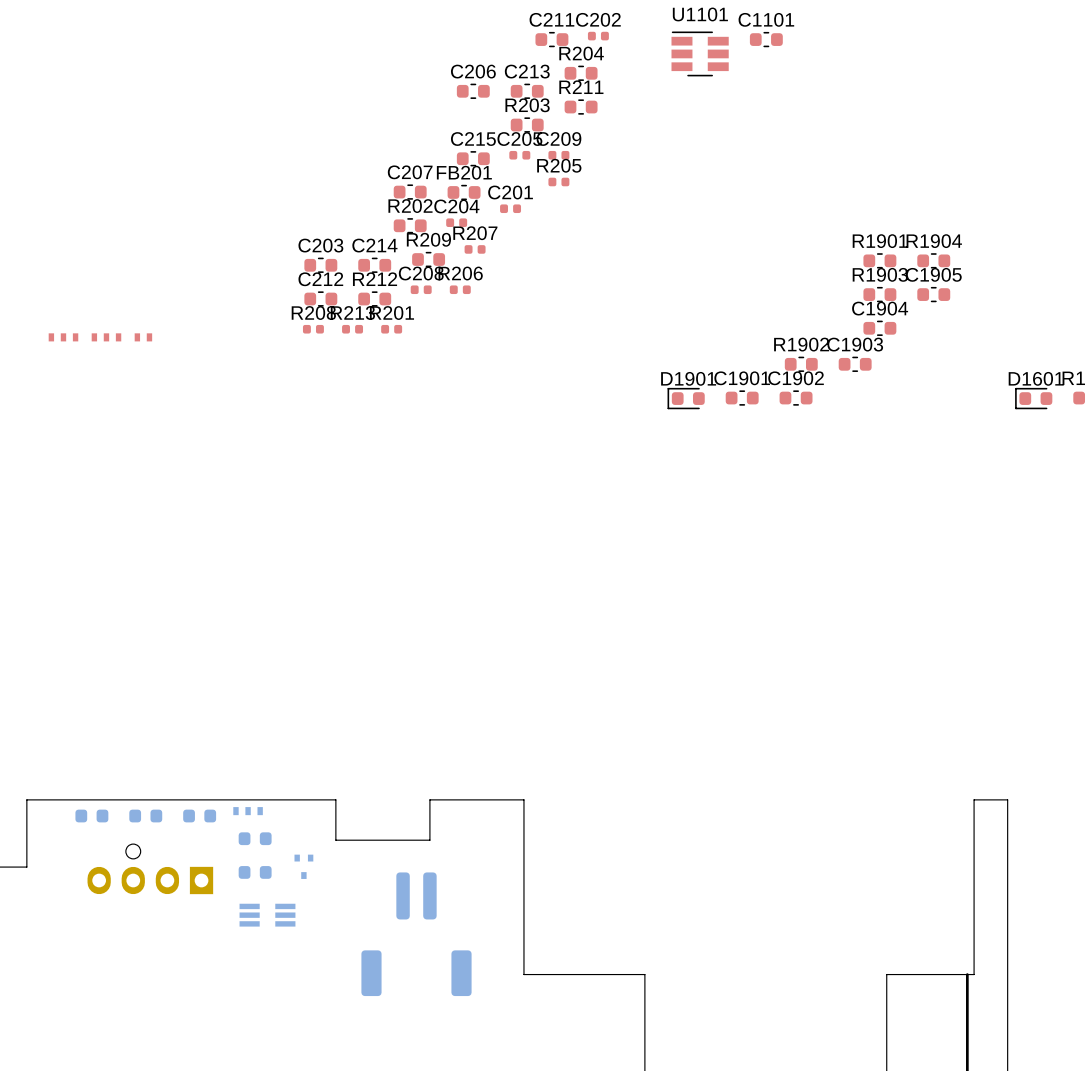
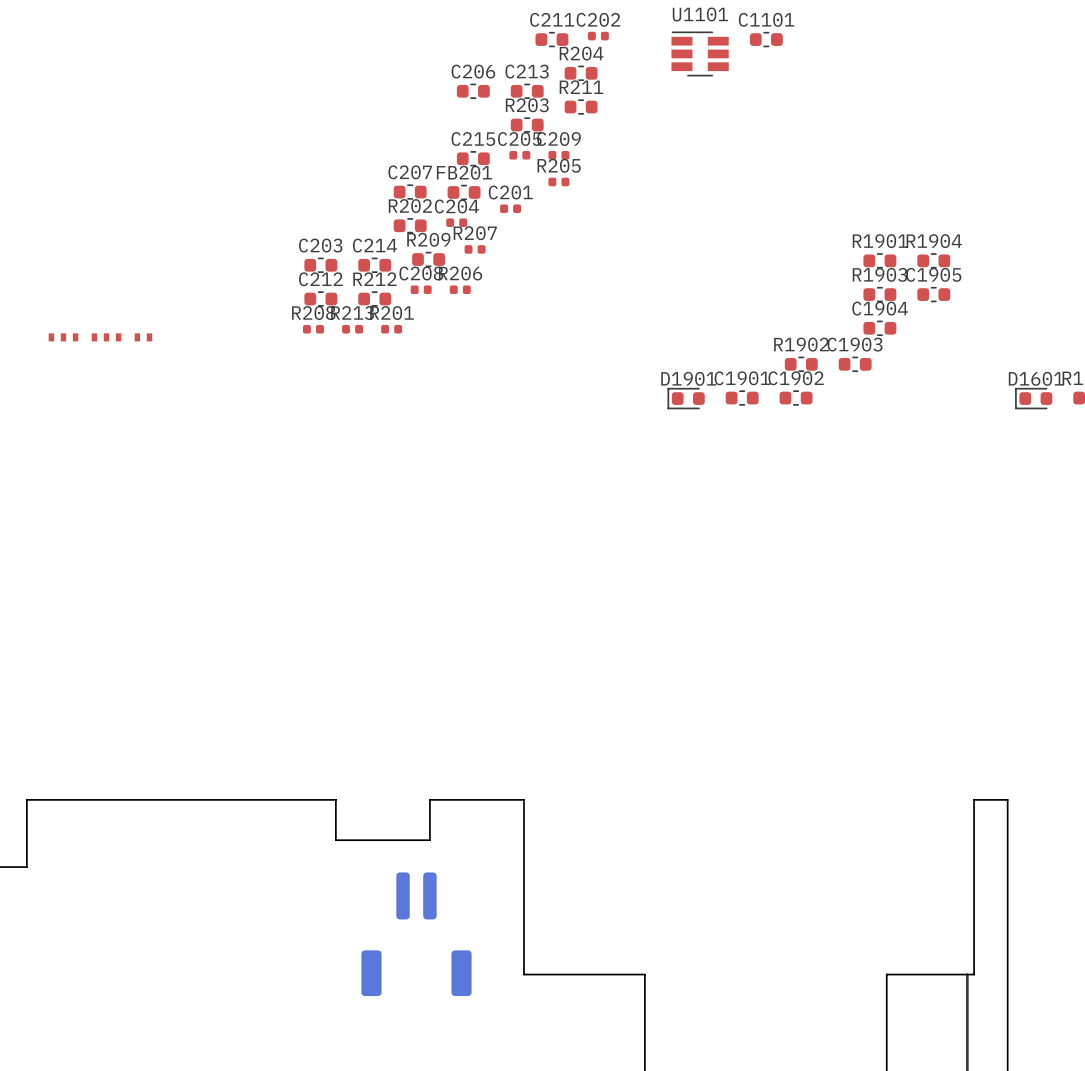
part: (248, 811) -> none
part: (91, 816) -> none
part: (145, 816) -> none
part: (199, 816) -> none
part: (255, 838) -> none
part: (303, 866) -> none
part: (150, 869) -> none
part: (255, 872) -> none
part: (267, 915) -> none

